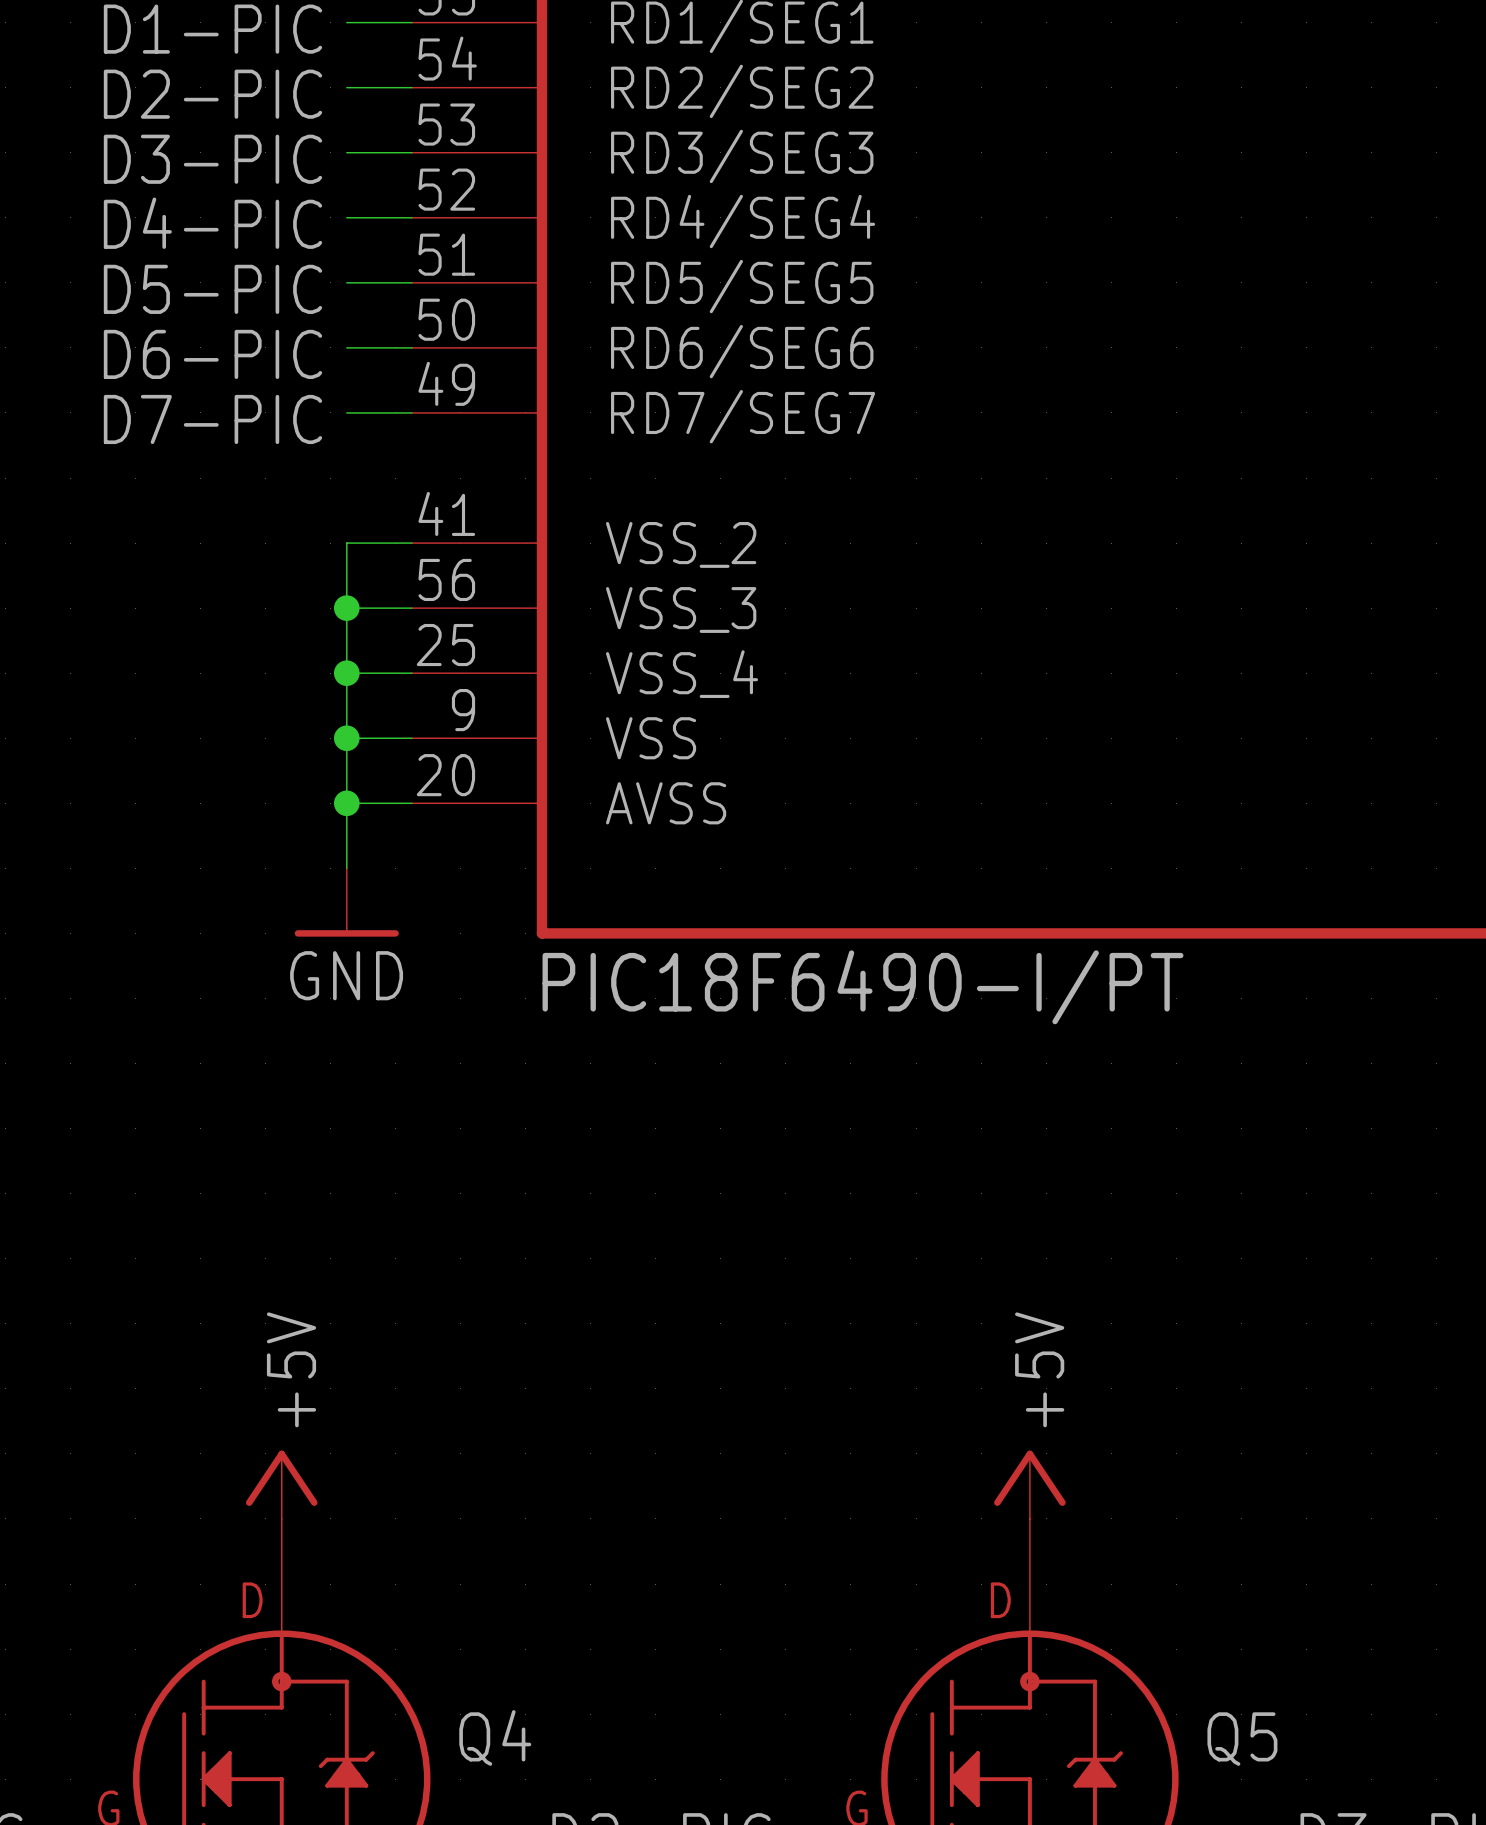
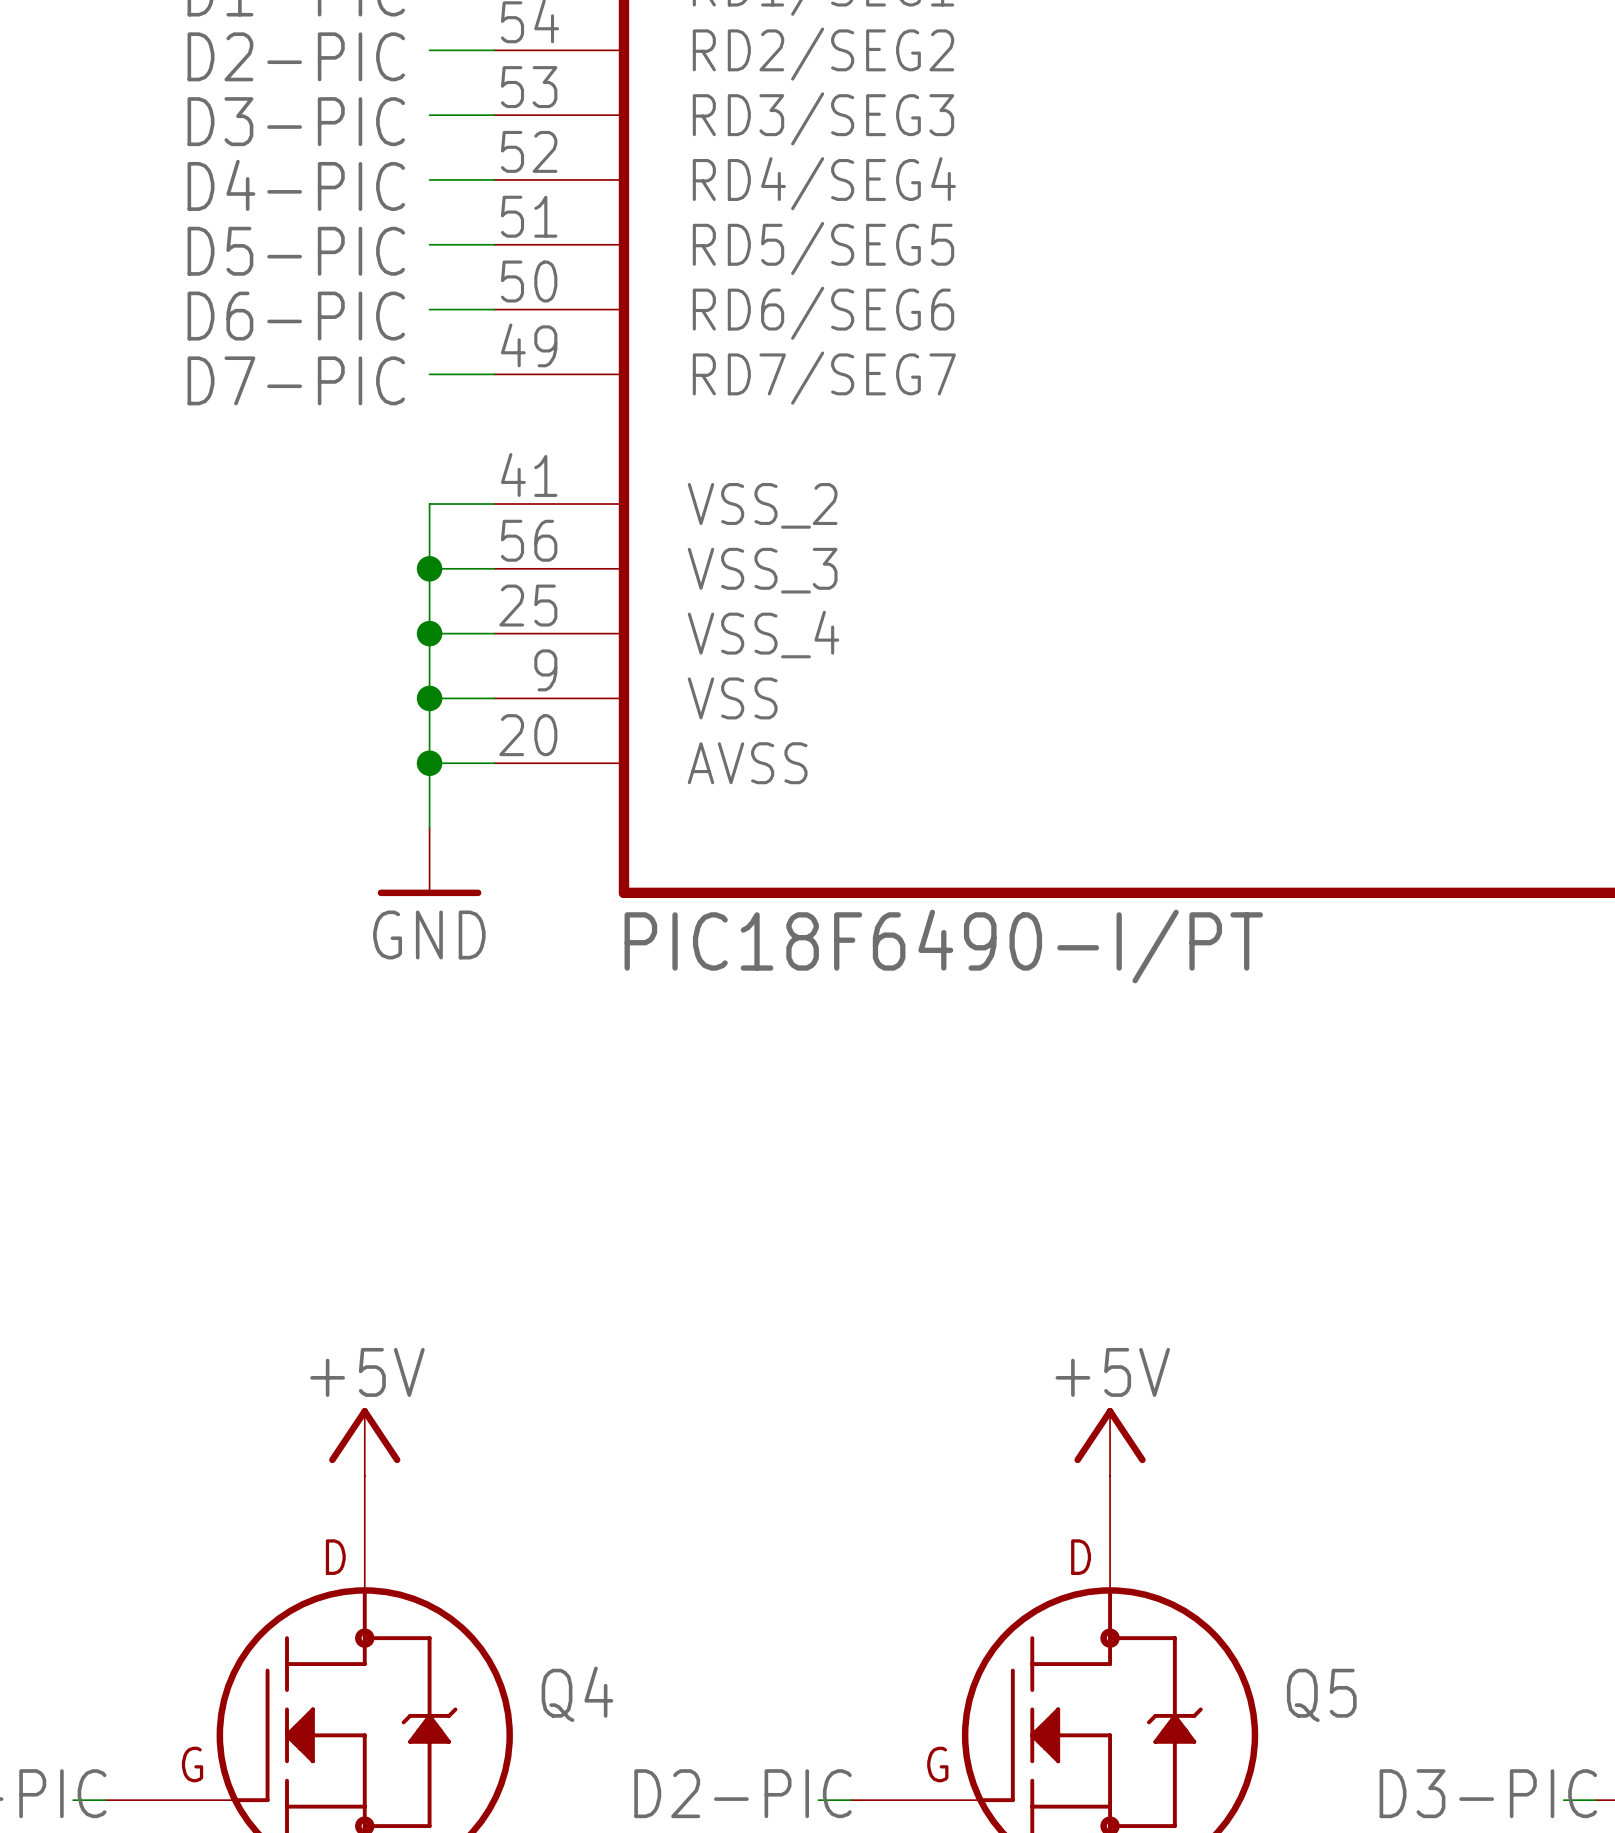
power symbol text rotation: 0° (291, 1369) -> 90° clockwise (367, 1372)
power symbol text rotation: 0° (1039, 1369) -> 90° clockwise (1112, 1372)

